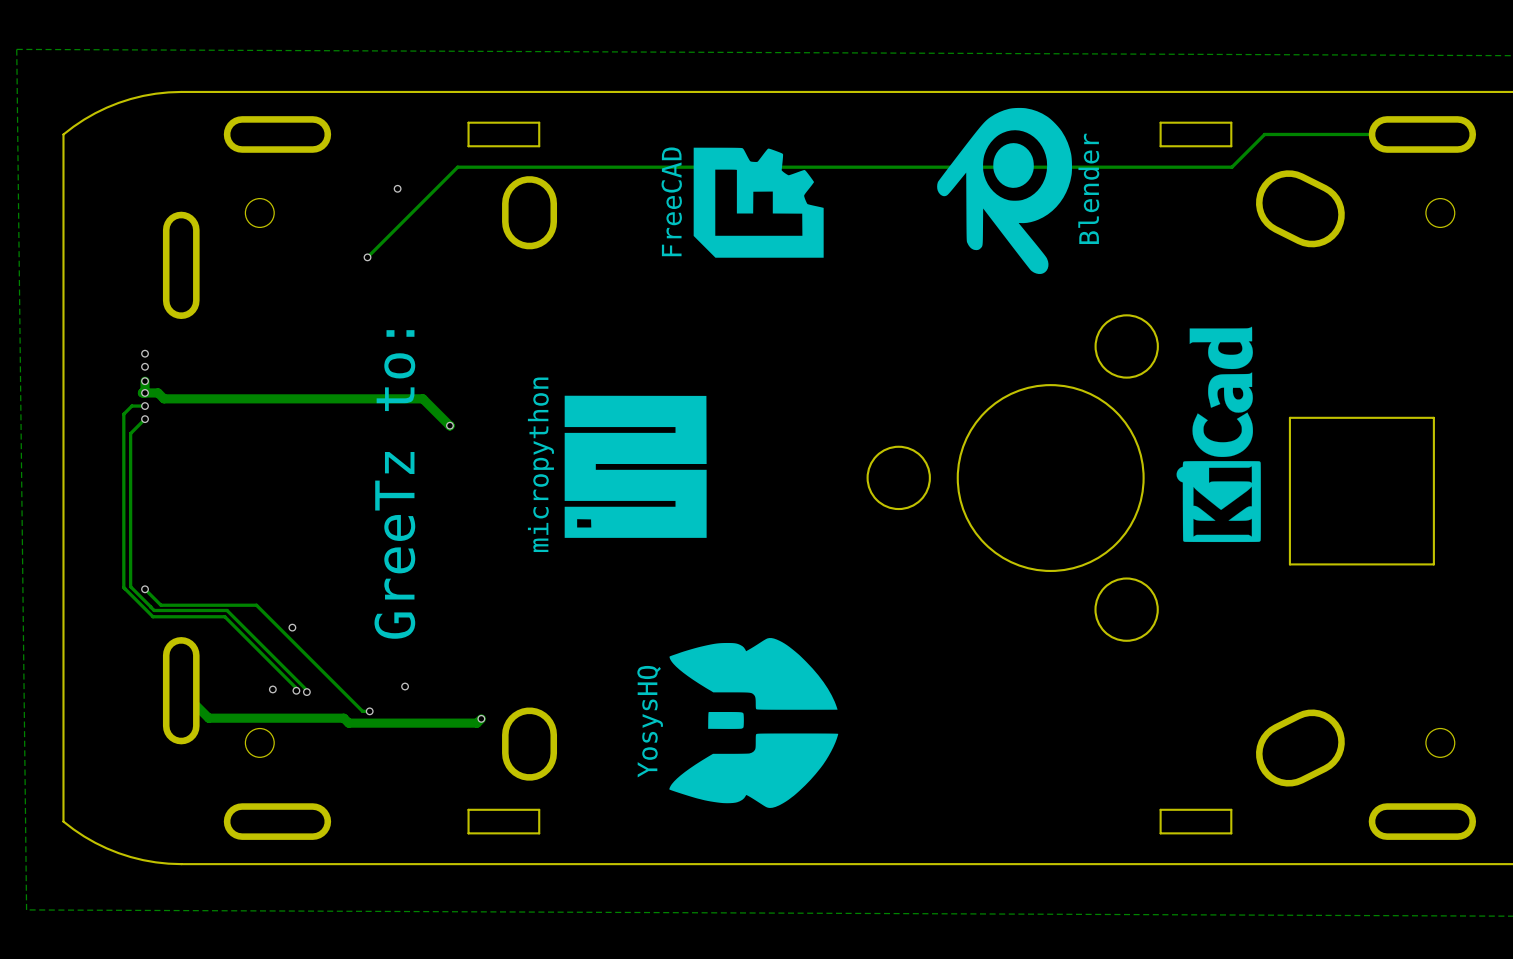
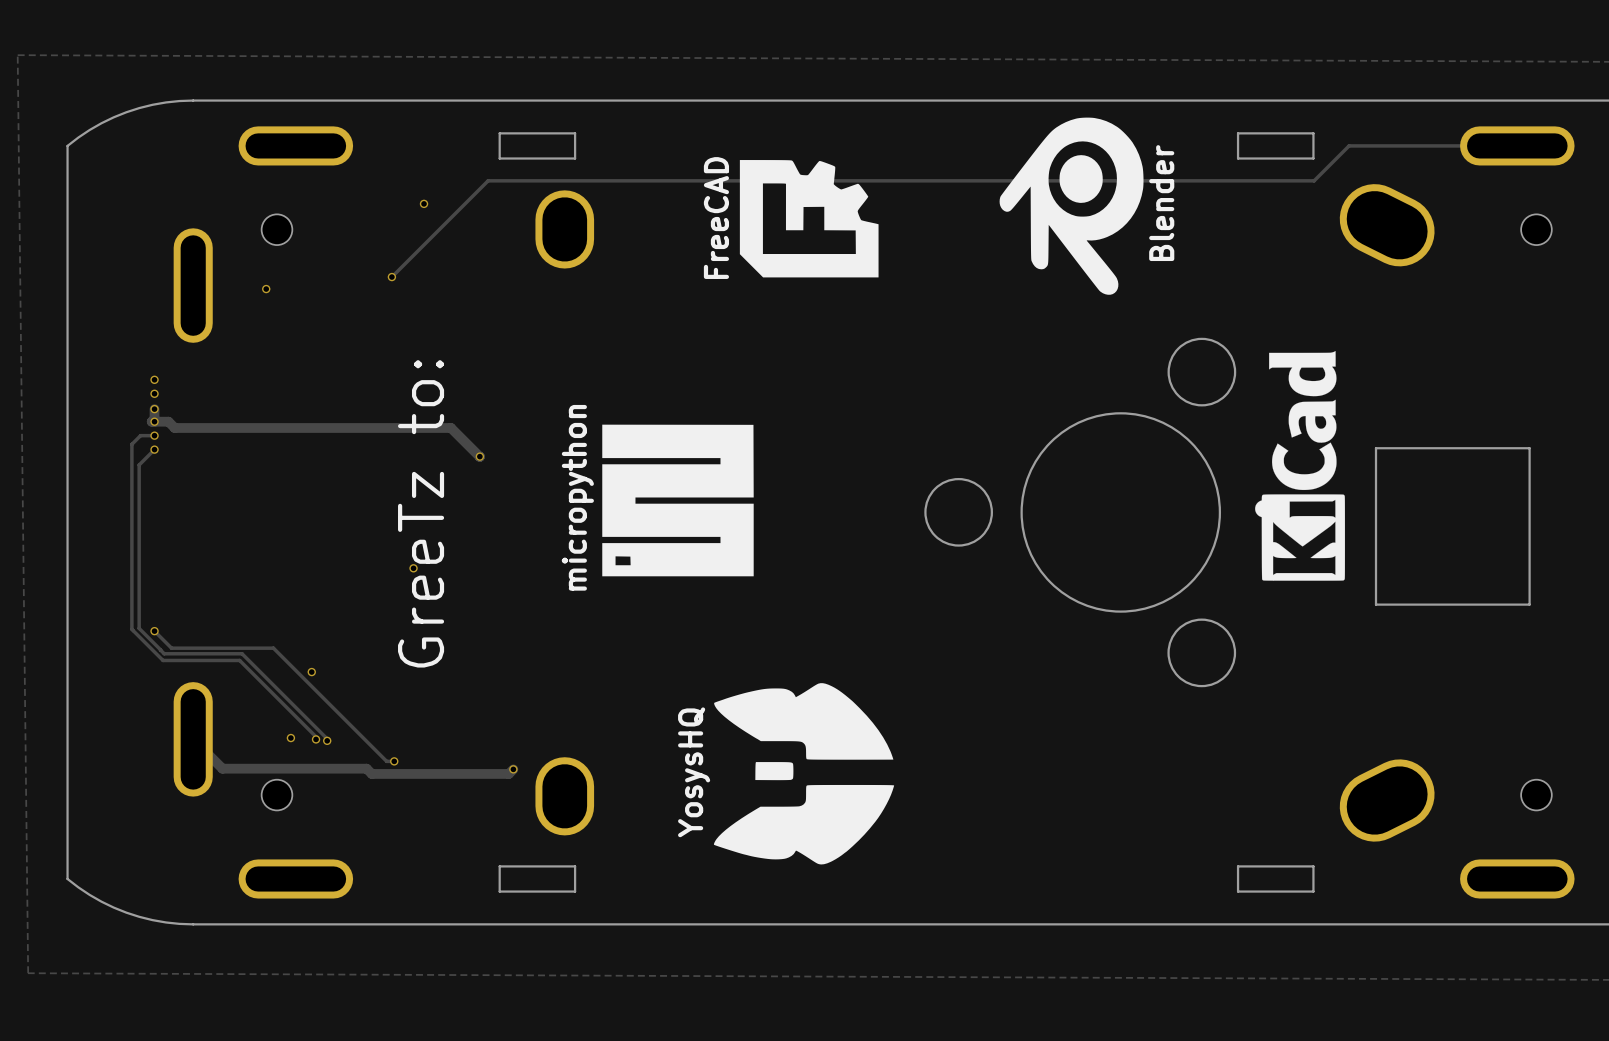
via: none -> (266, 289)
via: none -> (413, 568)
via: (405, 686) -> none

